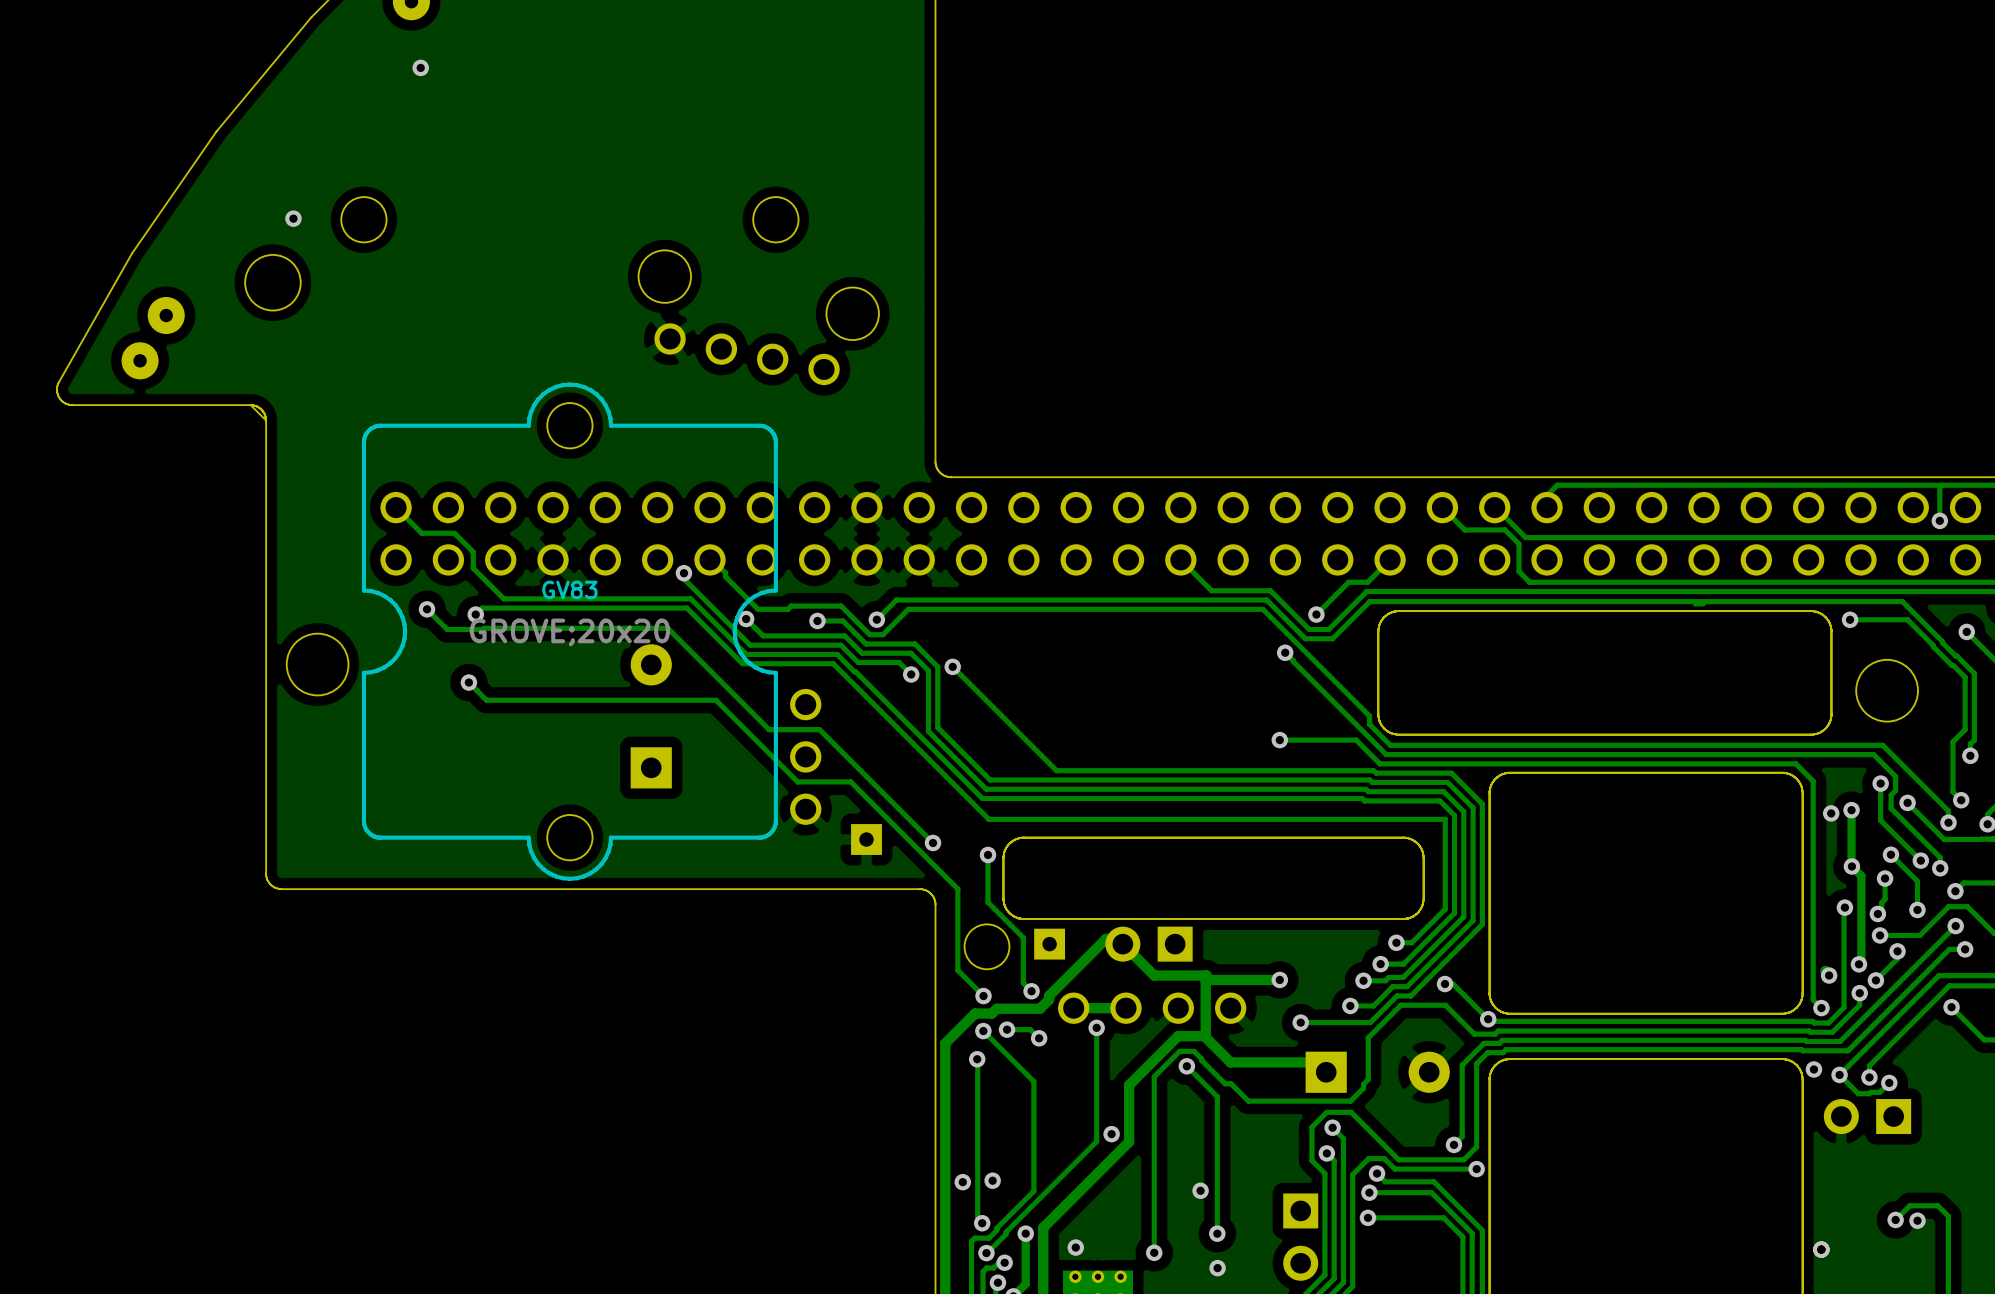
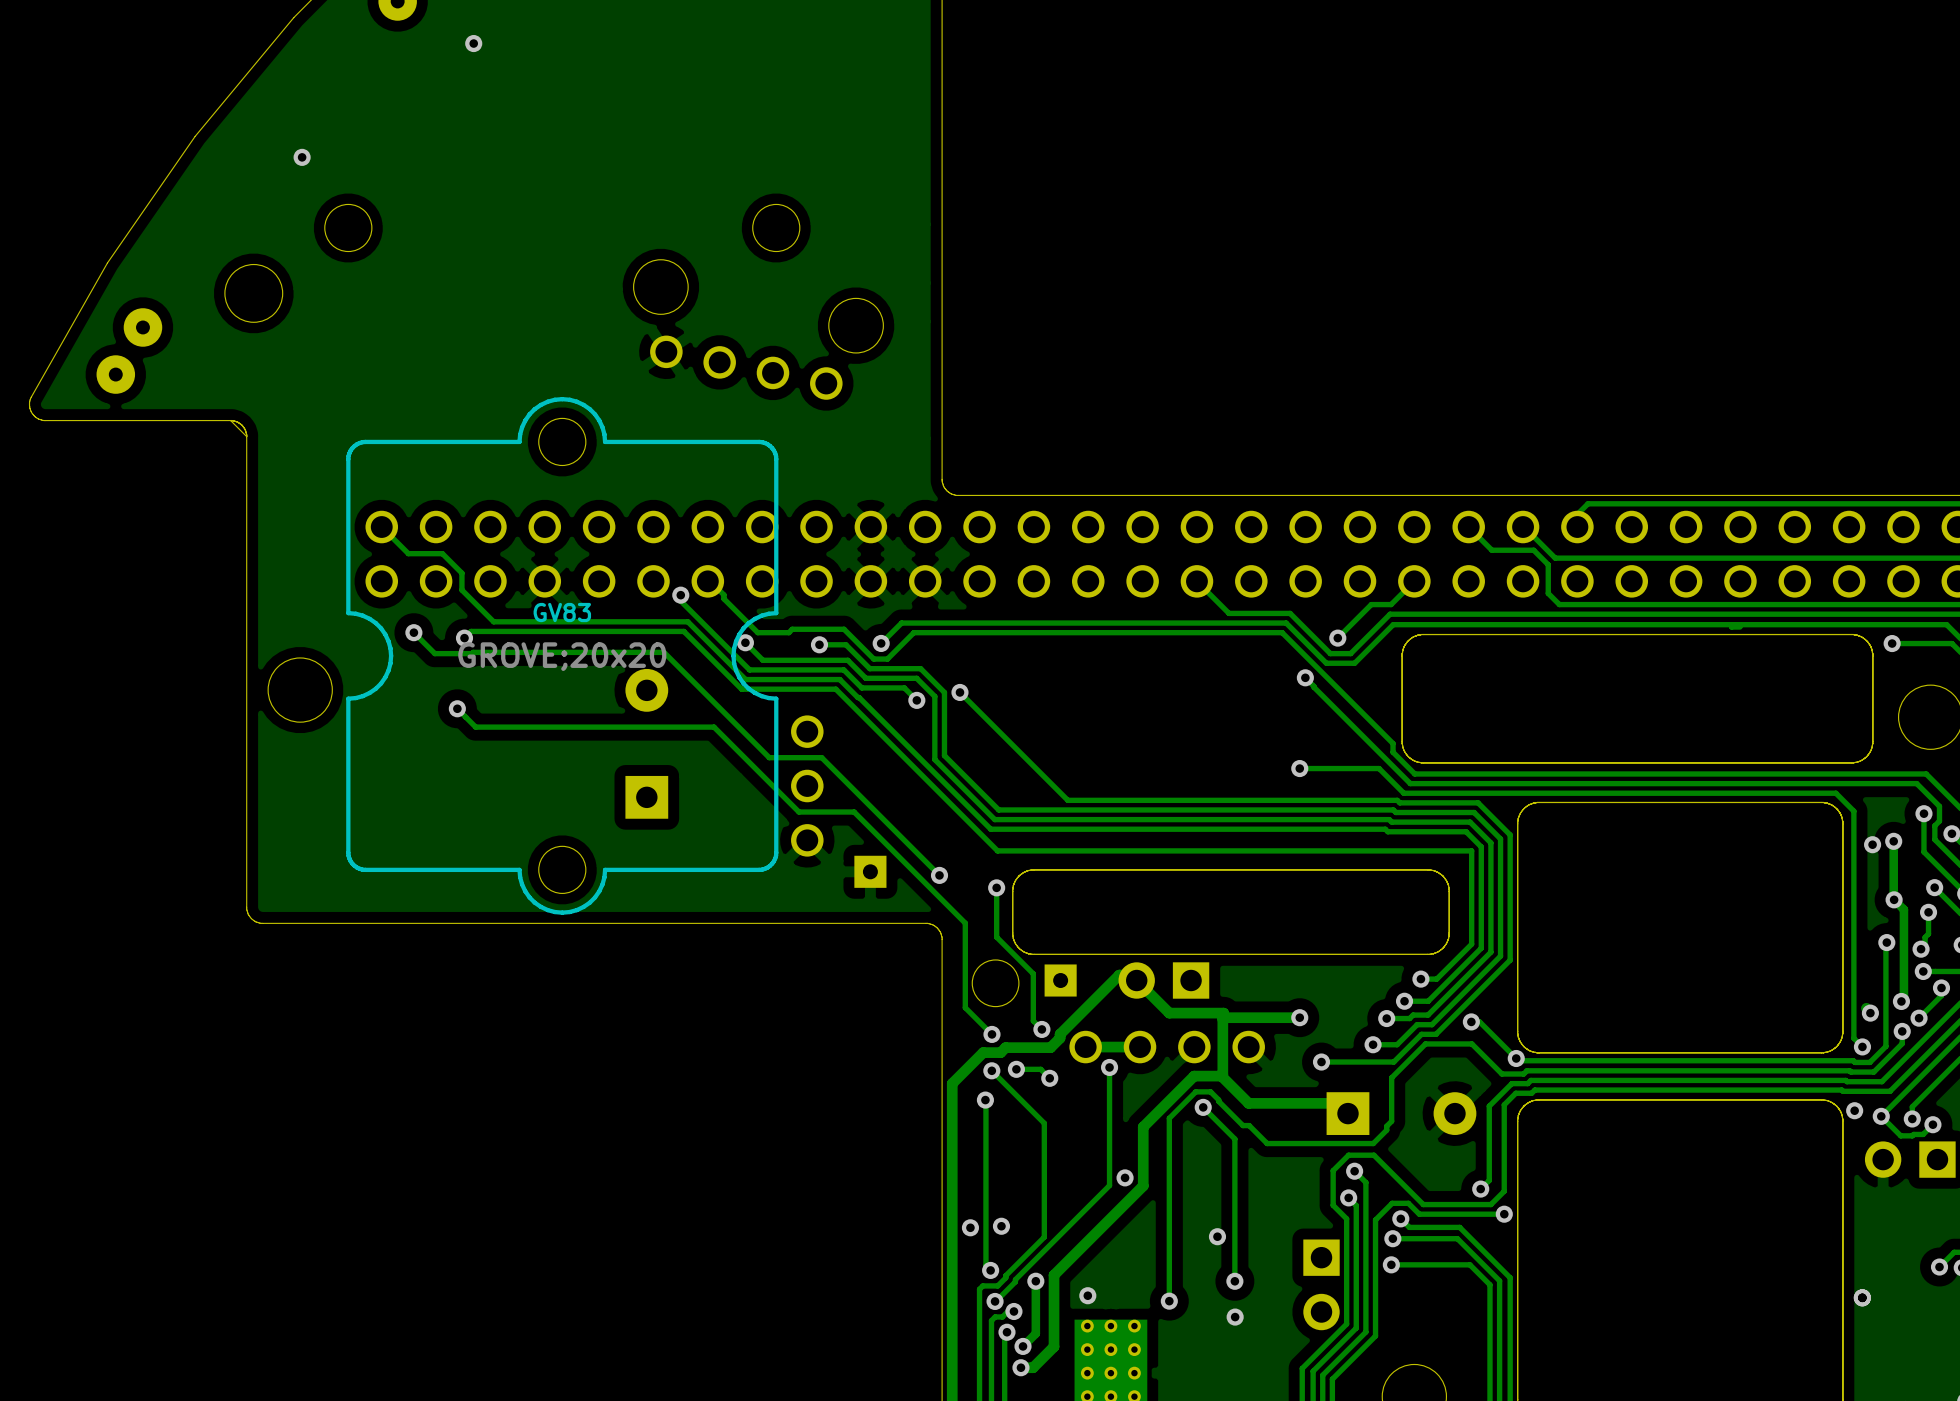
via: none -> (473, 43)
via: (420, 67) -> none
via: none -> (302, 157)
via: (293, 218) -> none

